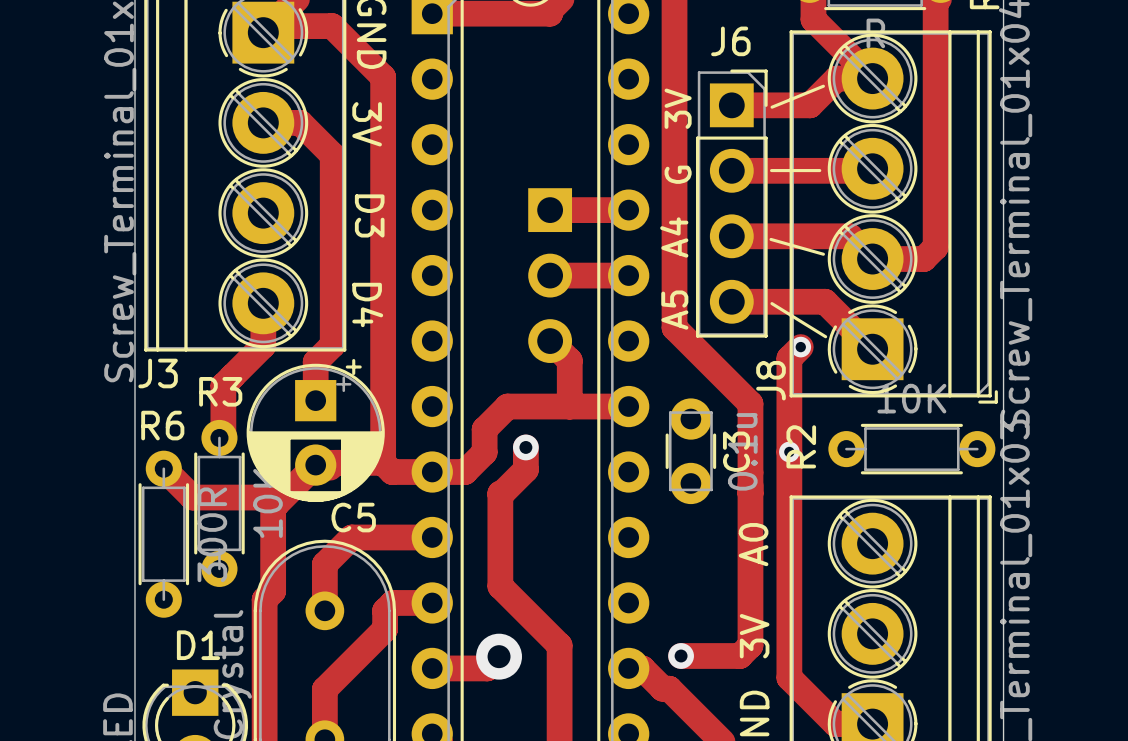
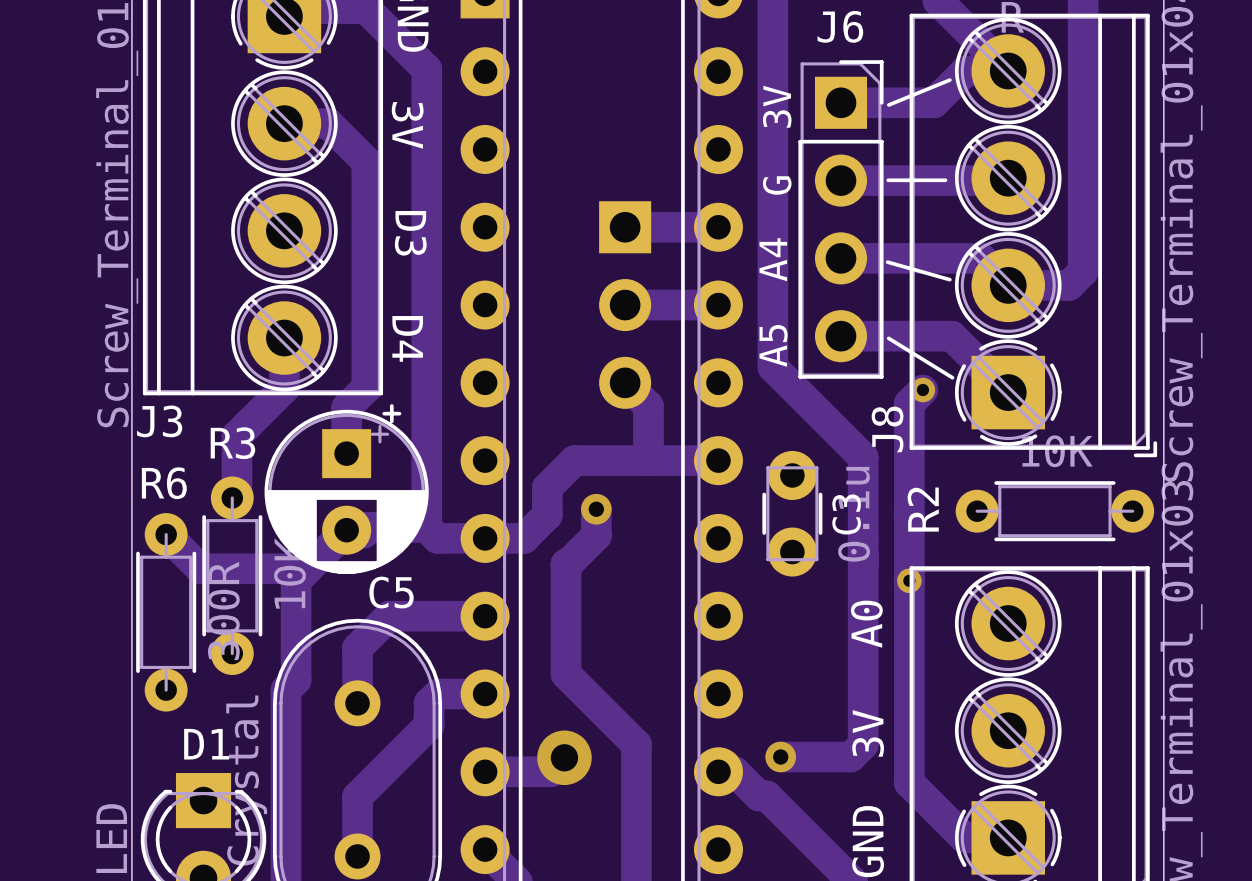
via position: (789, 451) -> (909, 580)

